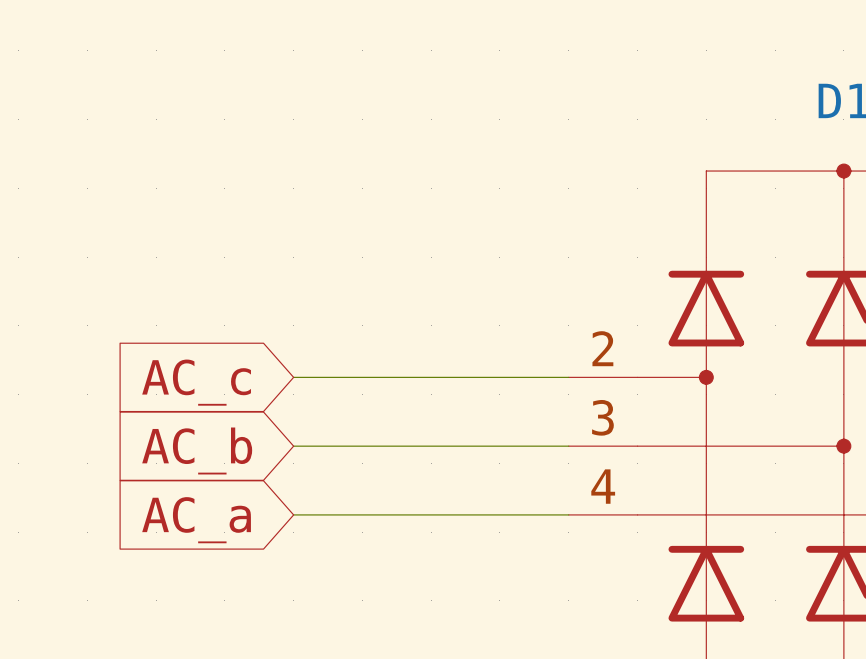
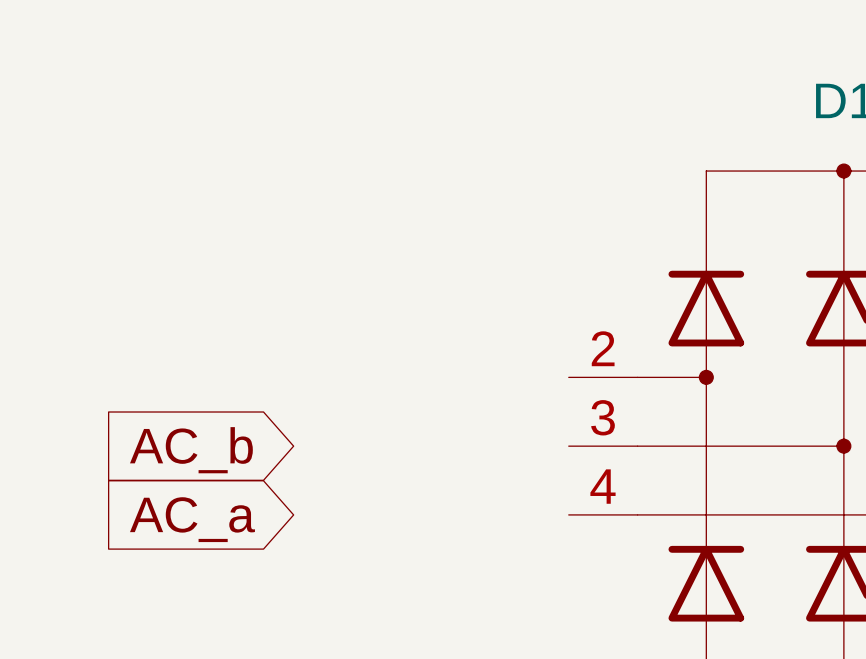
wire: (293, 377) (568, 377) -> none
global label: AC_c (196, 382) -> none
wire: (293, 446) (568, 446) -> none
wire: (293, 514) (568, 514) -> none

